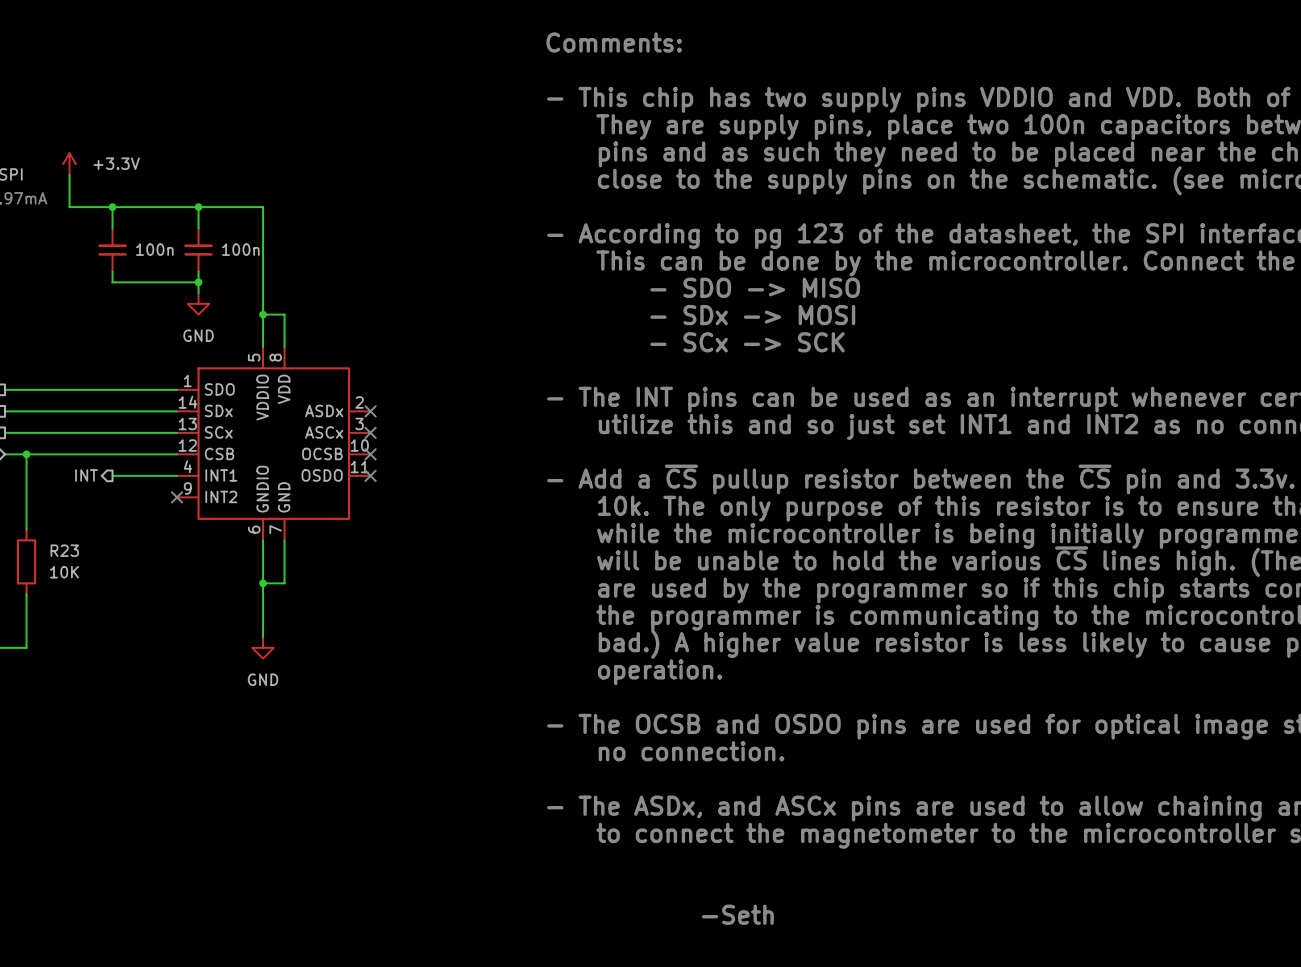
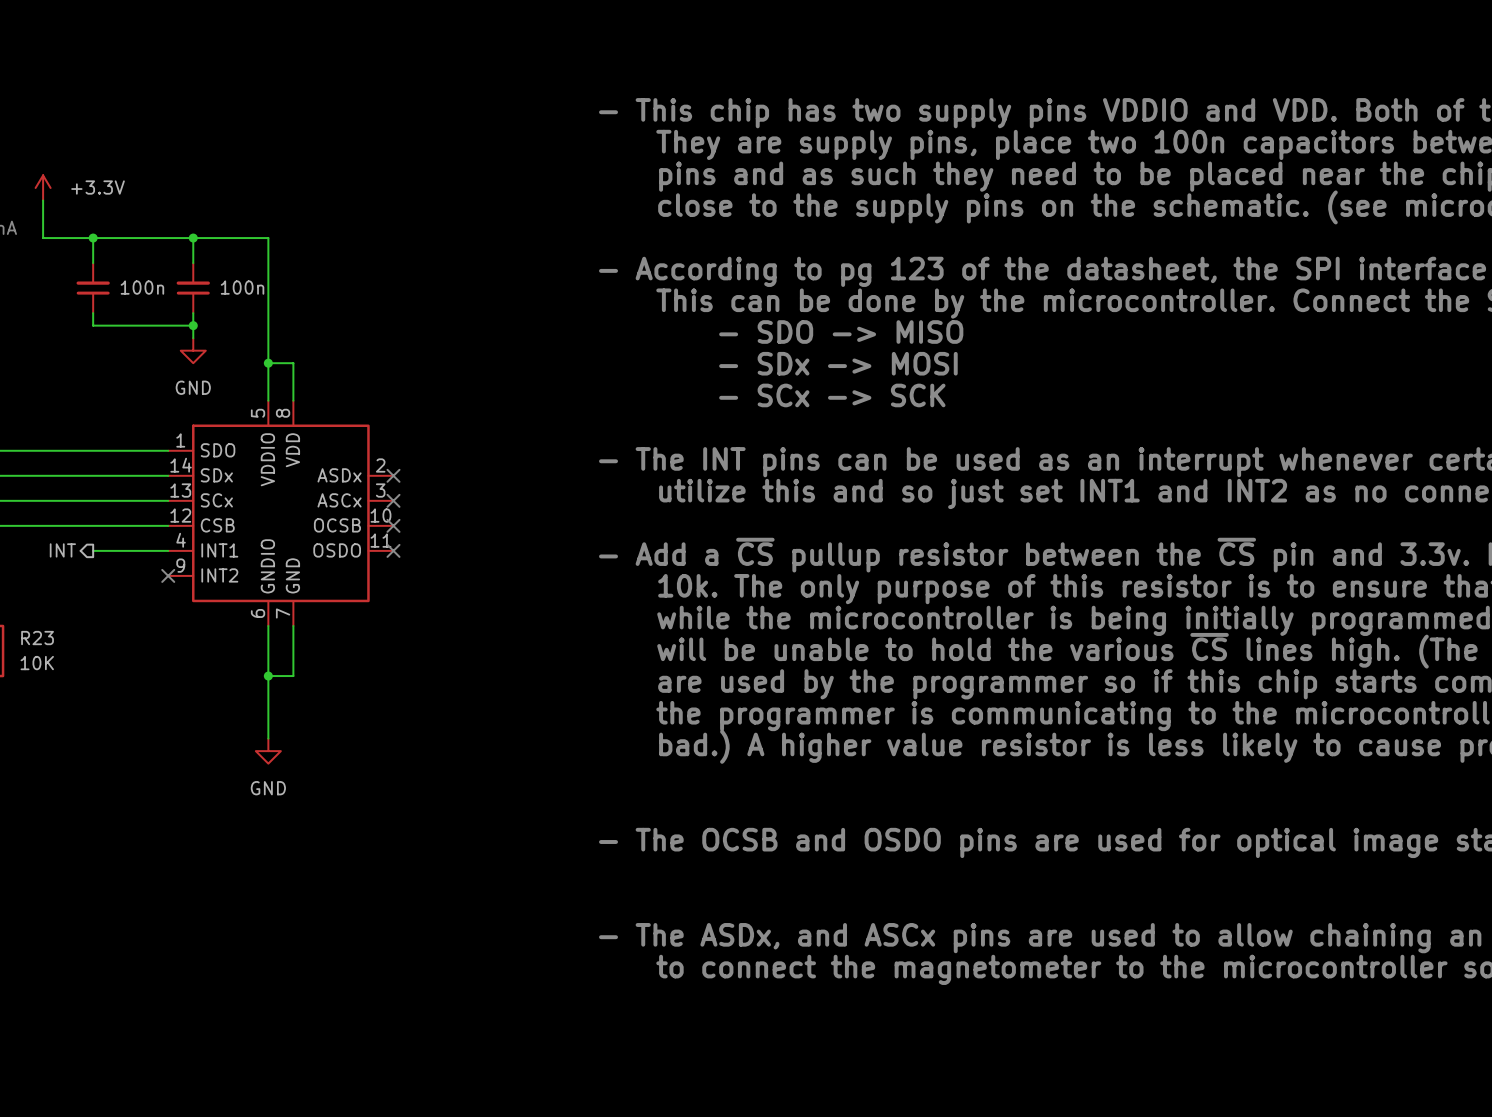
text: Comments: (614, 42) -> none
text: operation. (660, 672) -> none
text: no connection. (691, 751) -> none
text: -Seth (737, 914) -> none

